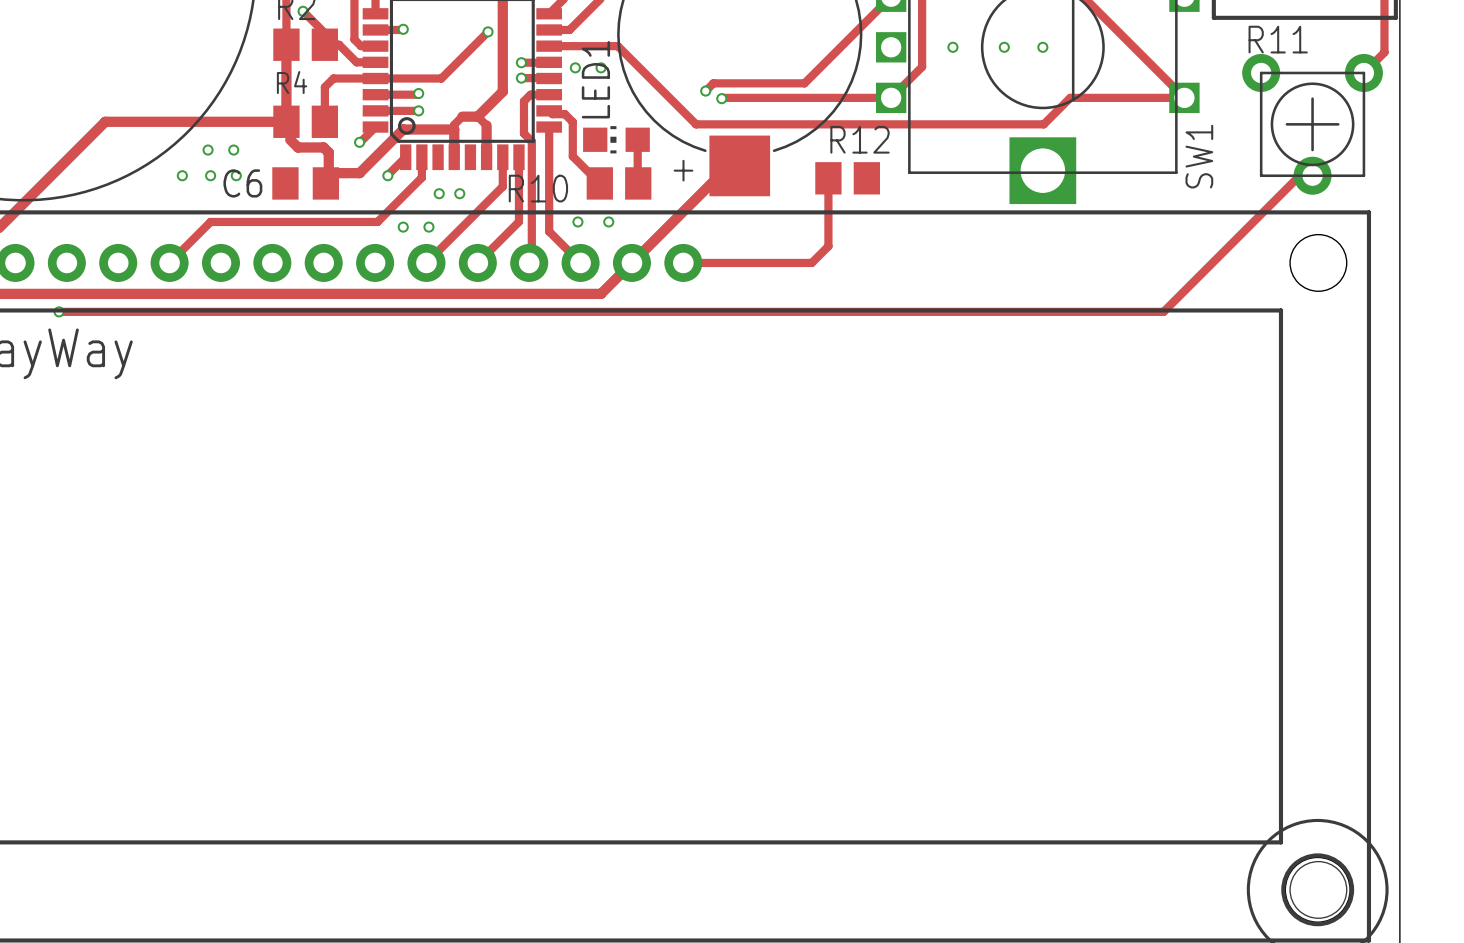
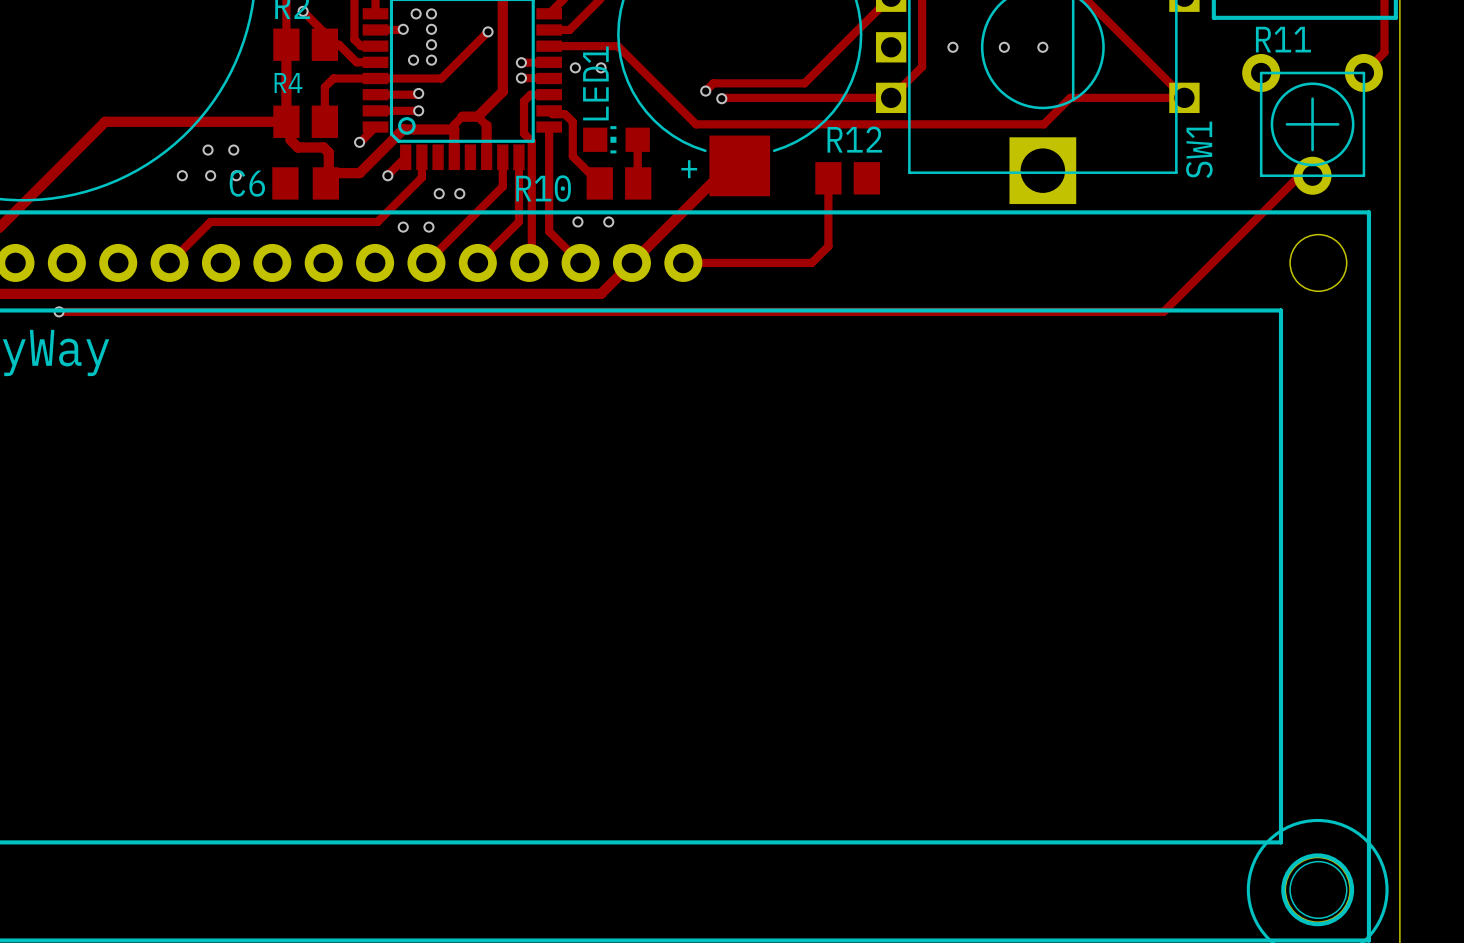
via: none -> (416, 13)
via: none -> (431, 13)
via: none -> (431, 29)
via: none -> (431, 44)
via: none -> (413, 60)
via: none -> (431, 60)

